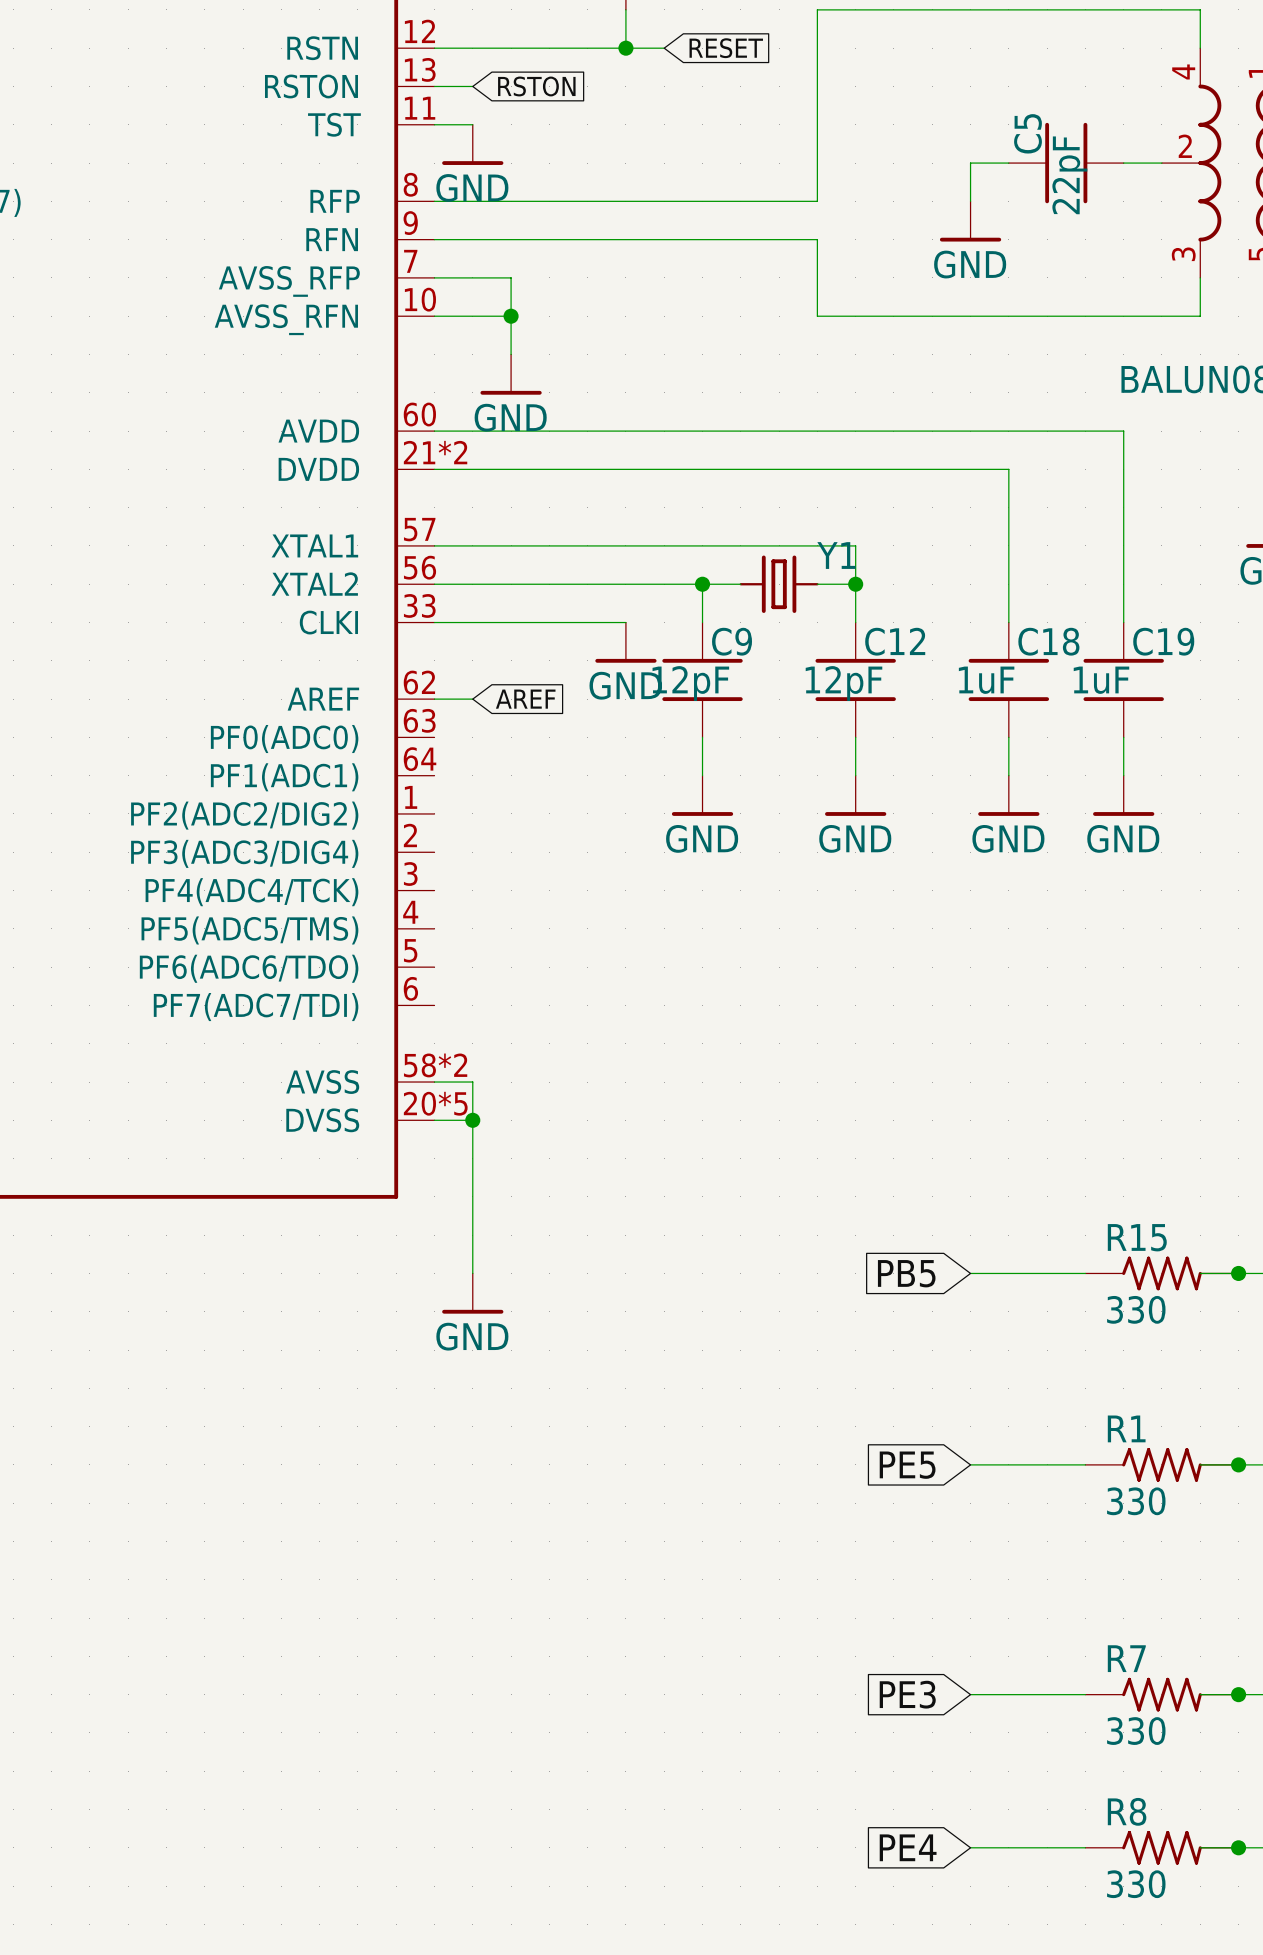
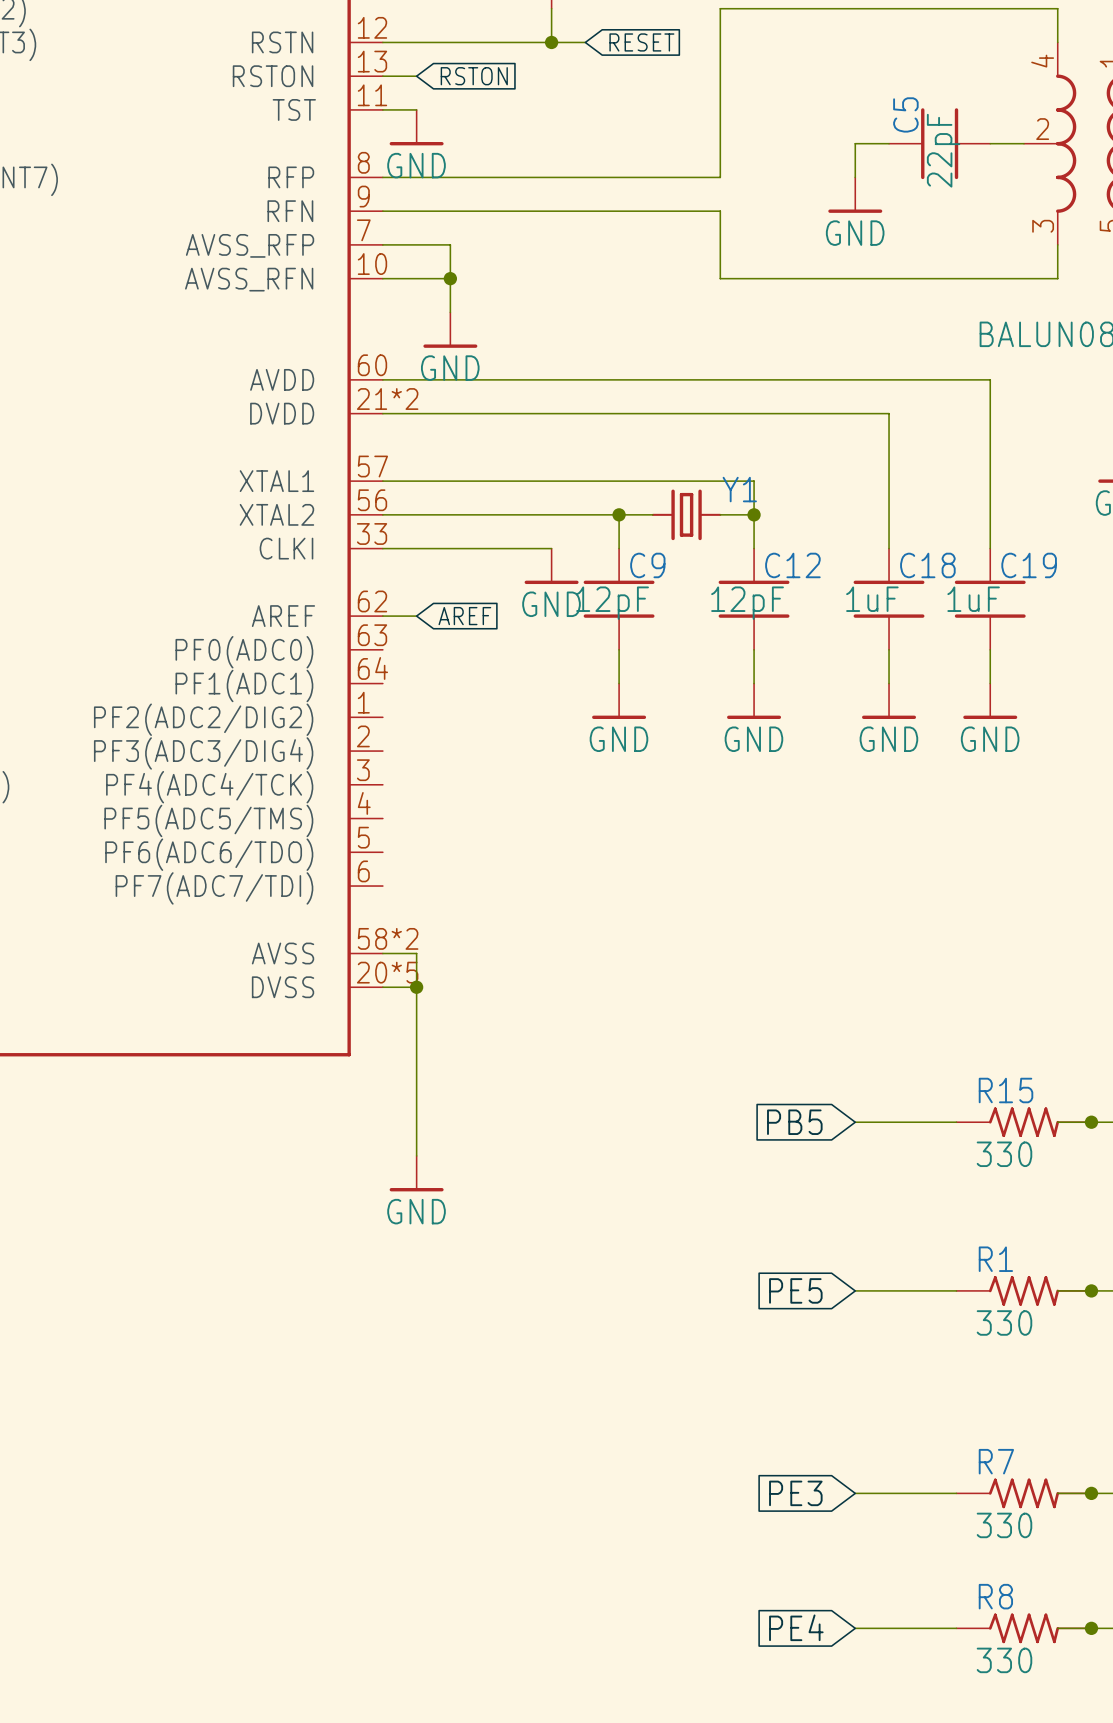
power symbol position: GND (472, 1293) -> GND (416, 1173)

